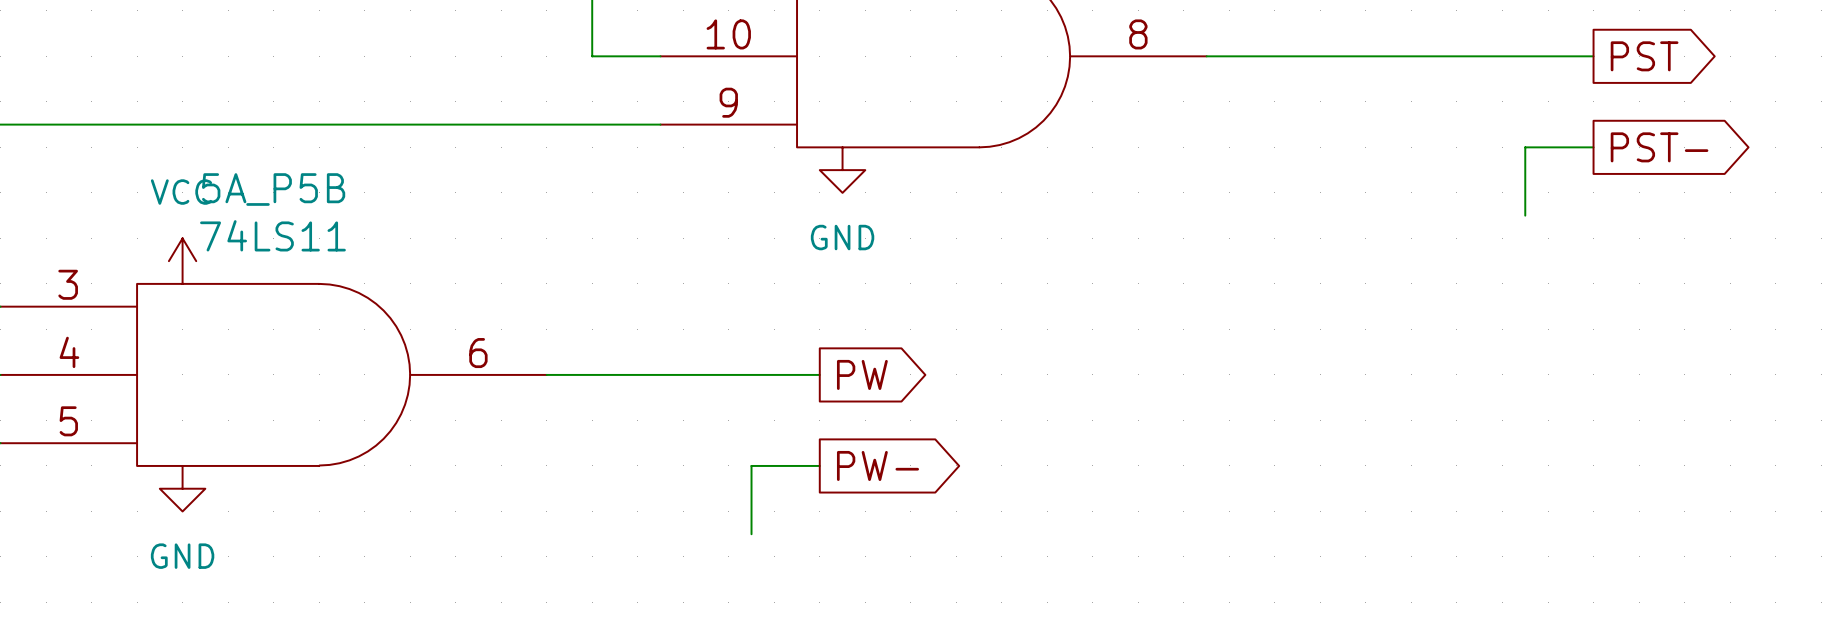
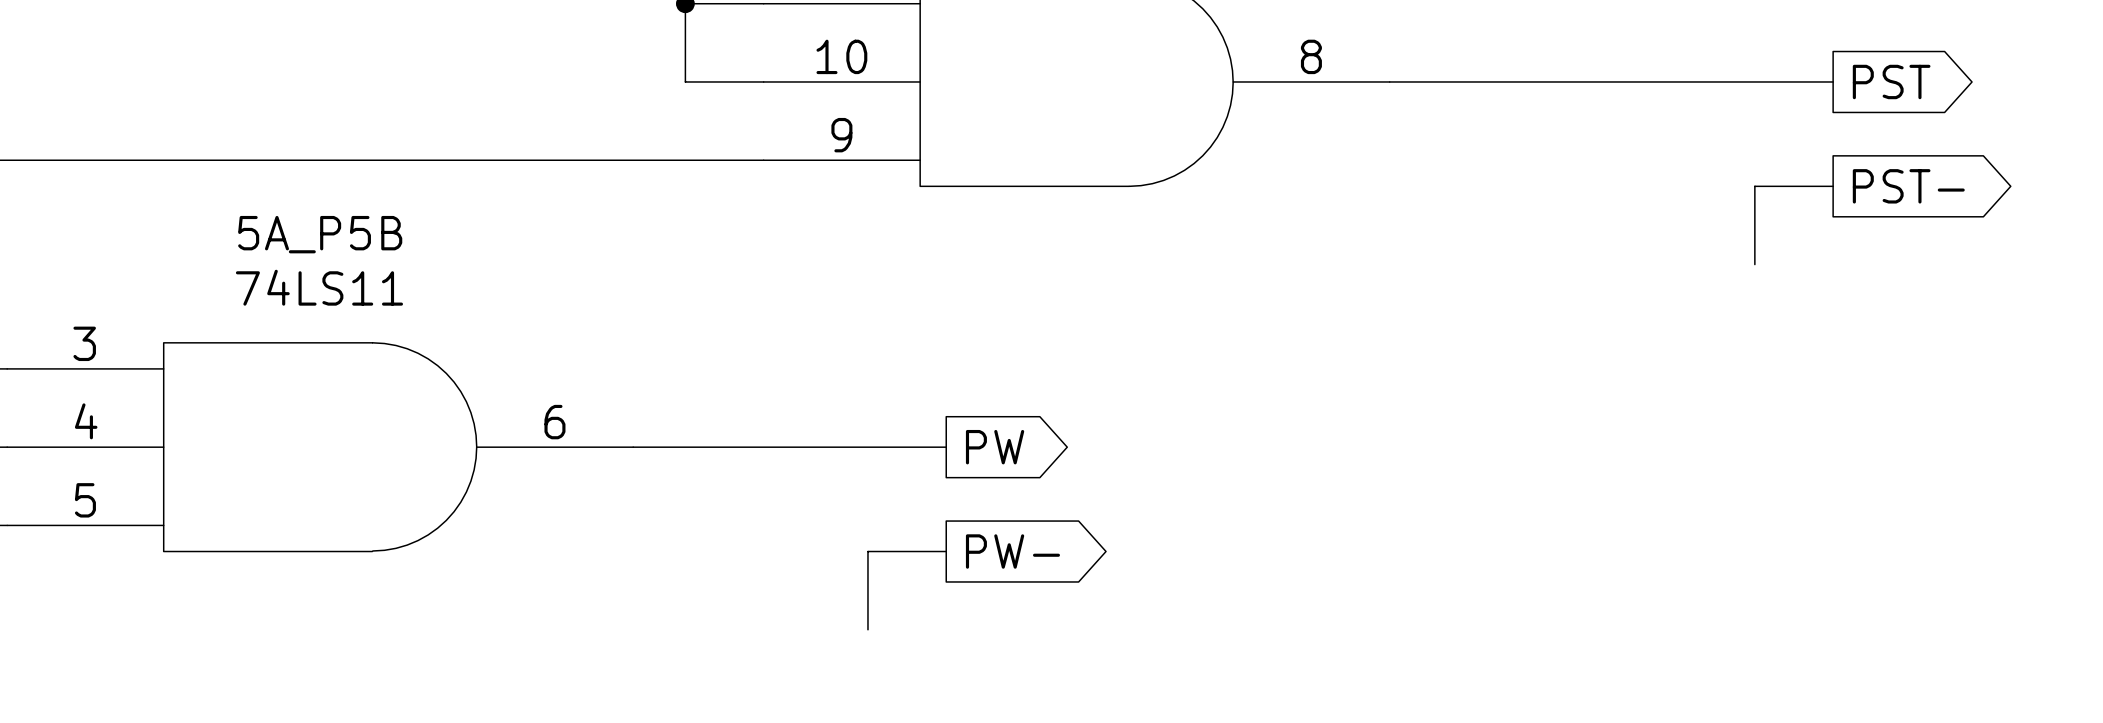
power symbol: GND (842, 170) -> none
power symbol: VCC (182, 261) -> none
power symbol: GND (182, 488) -> none

